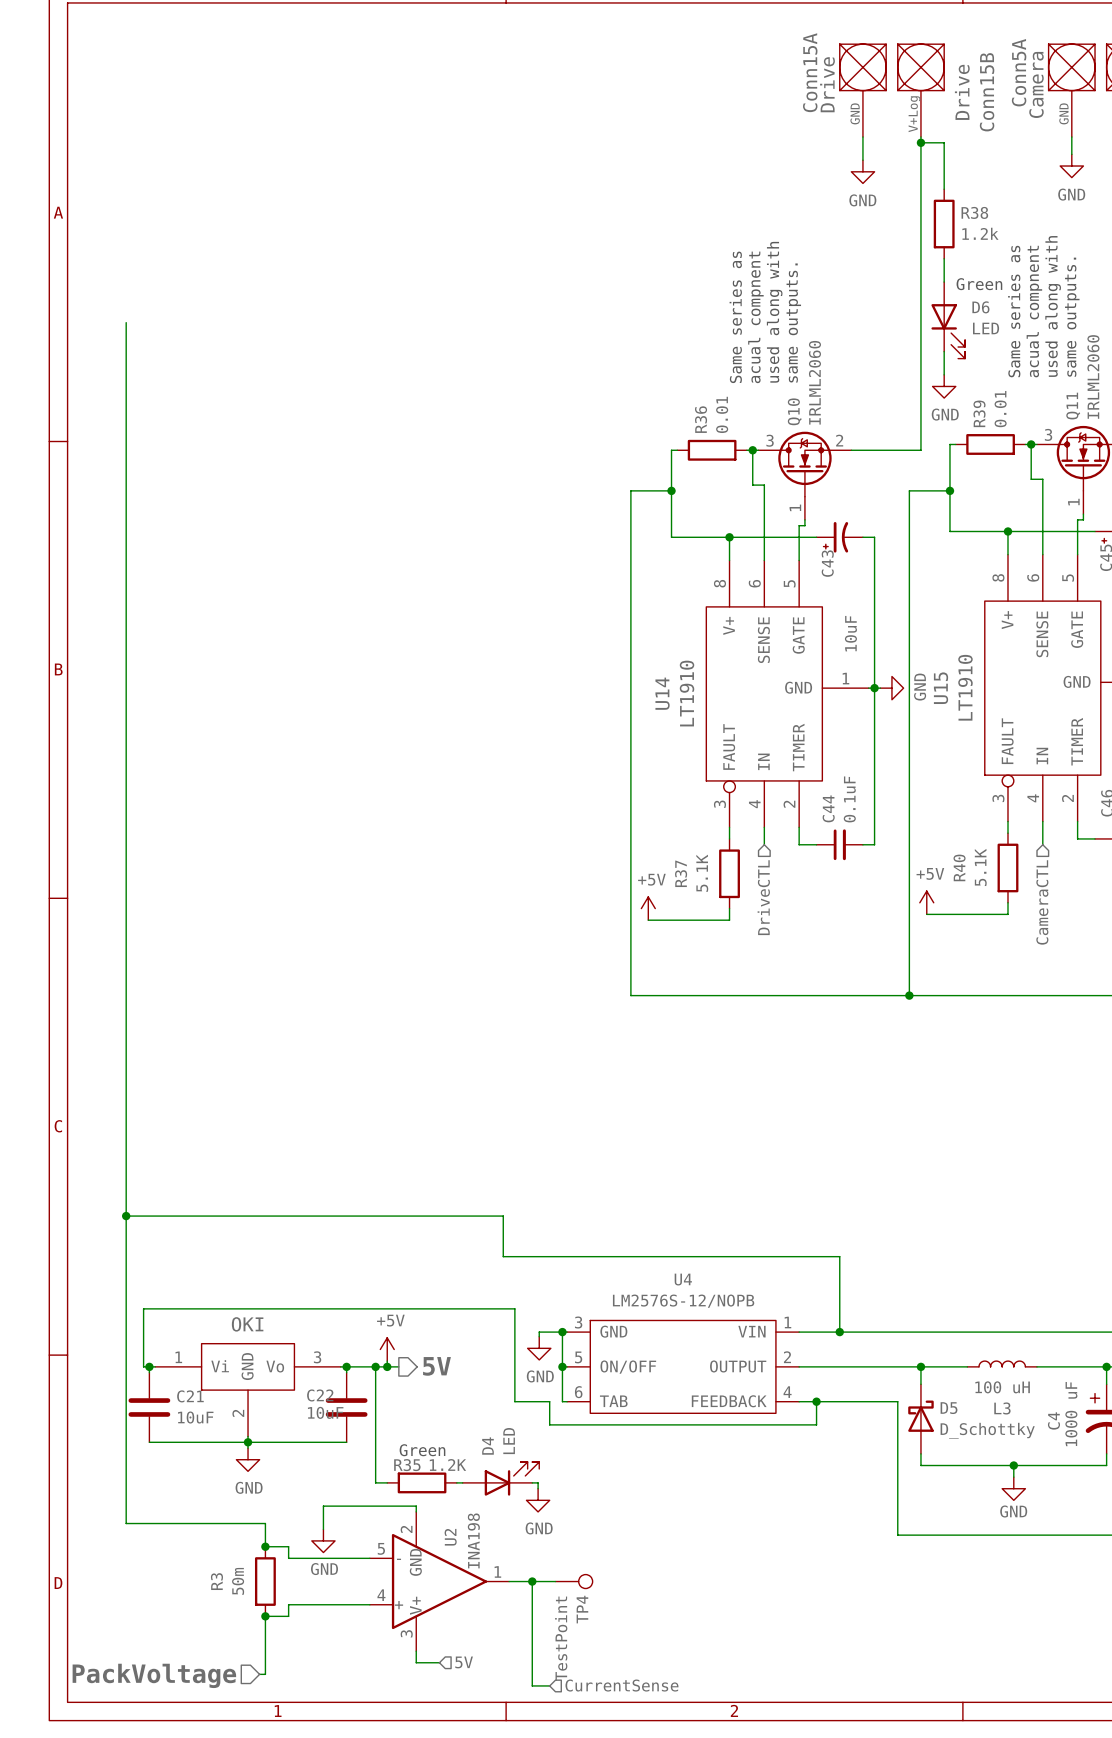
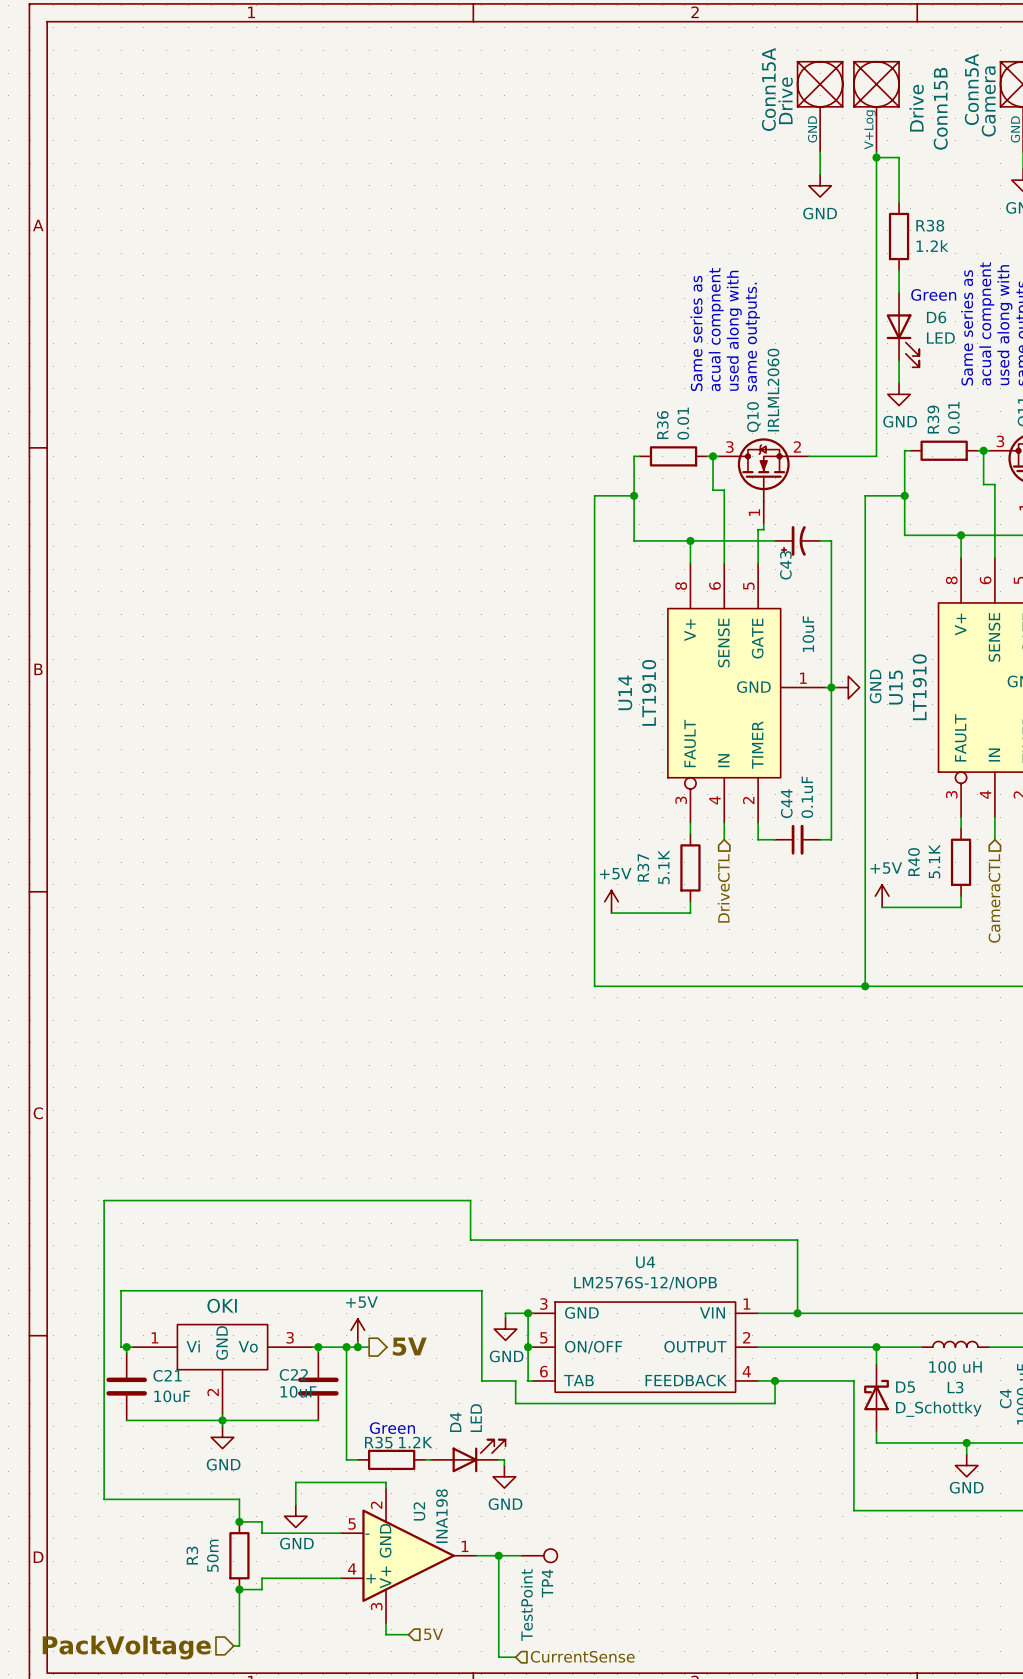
wire: (126, 322) (126, 1216) -> none
junction: (126, 1216) -> none

